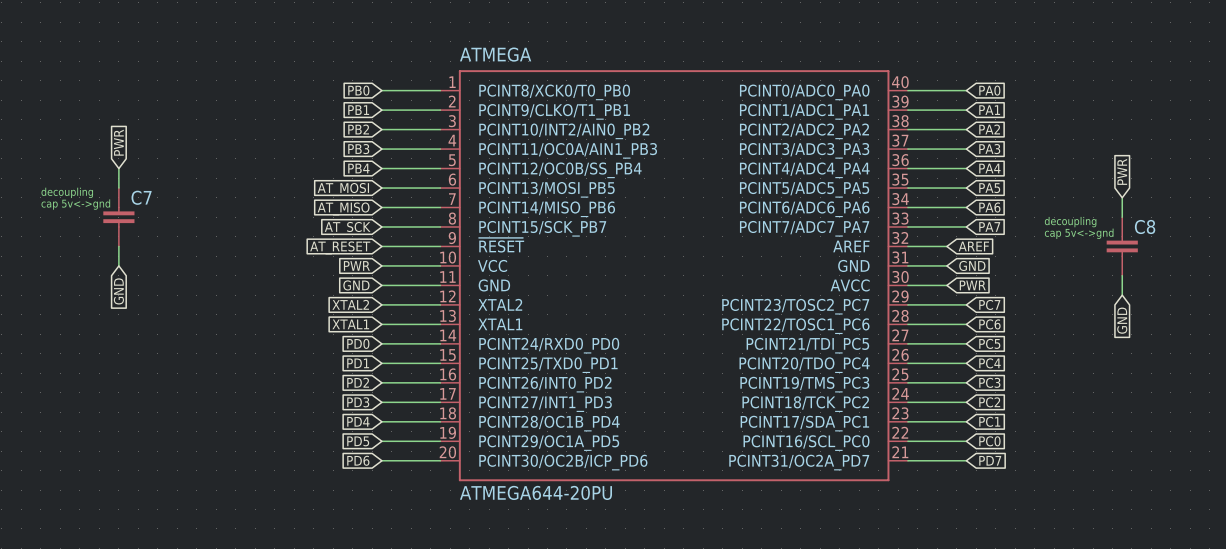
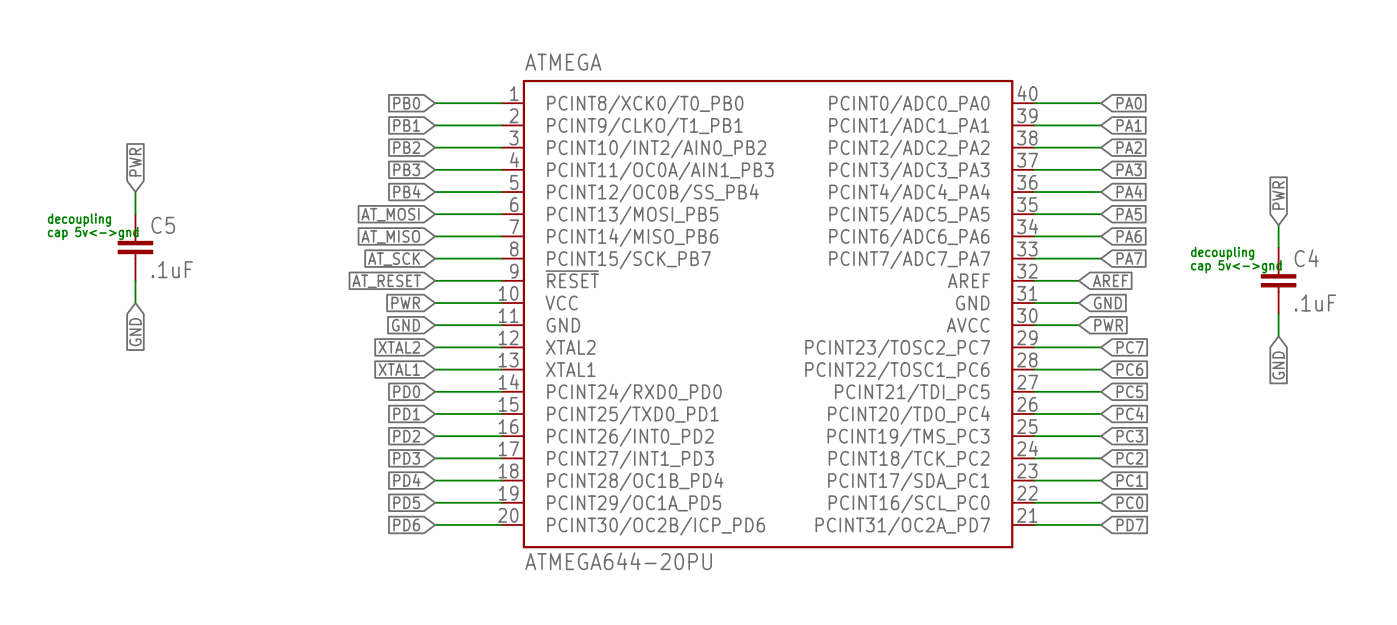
C7 name: C7 (141, 197) -> C5 (163, 225)
C8 name: C8 (1145, 227) -> C4 (1306, 258)
C7 value: none -> .1uF (172, 269)
C8 value: none -> .1uF (1315, 303)

